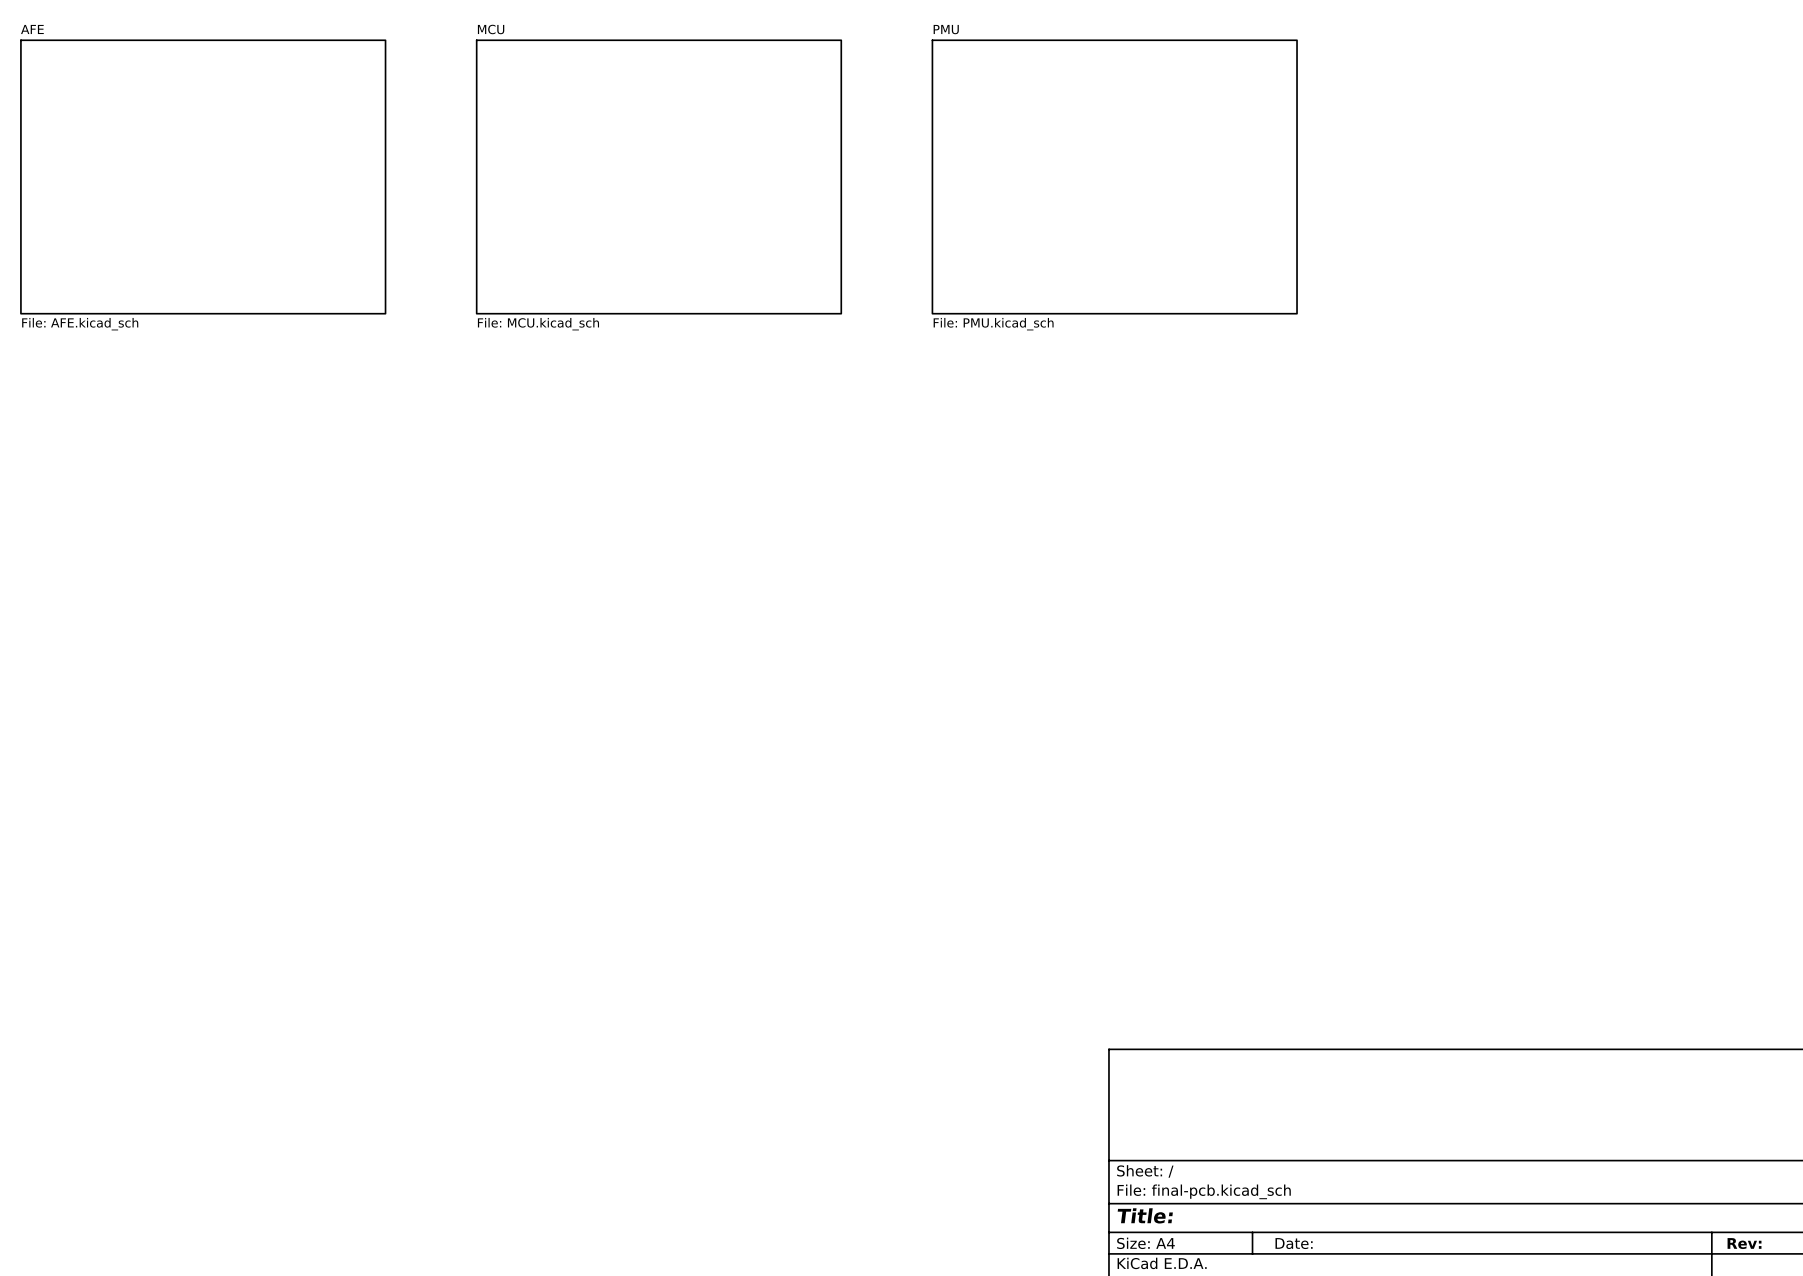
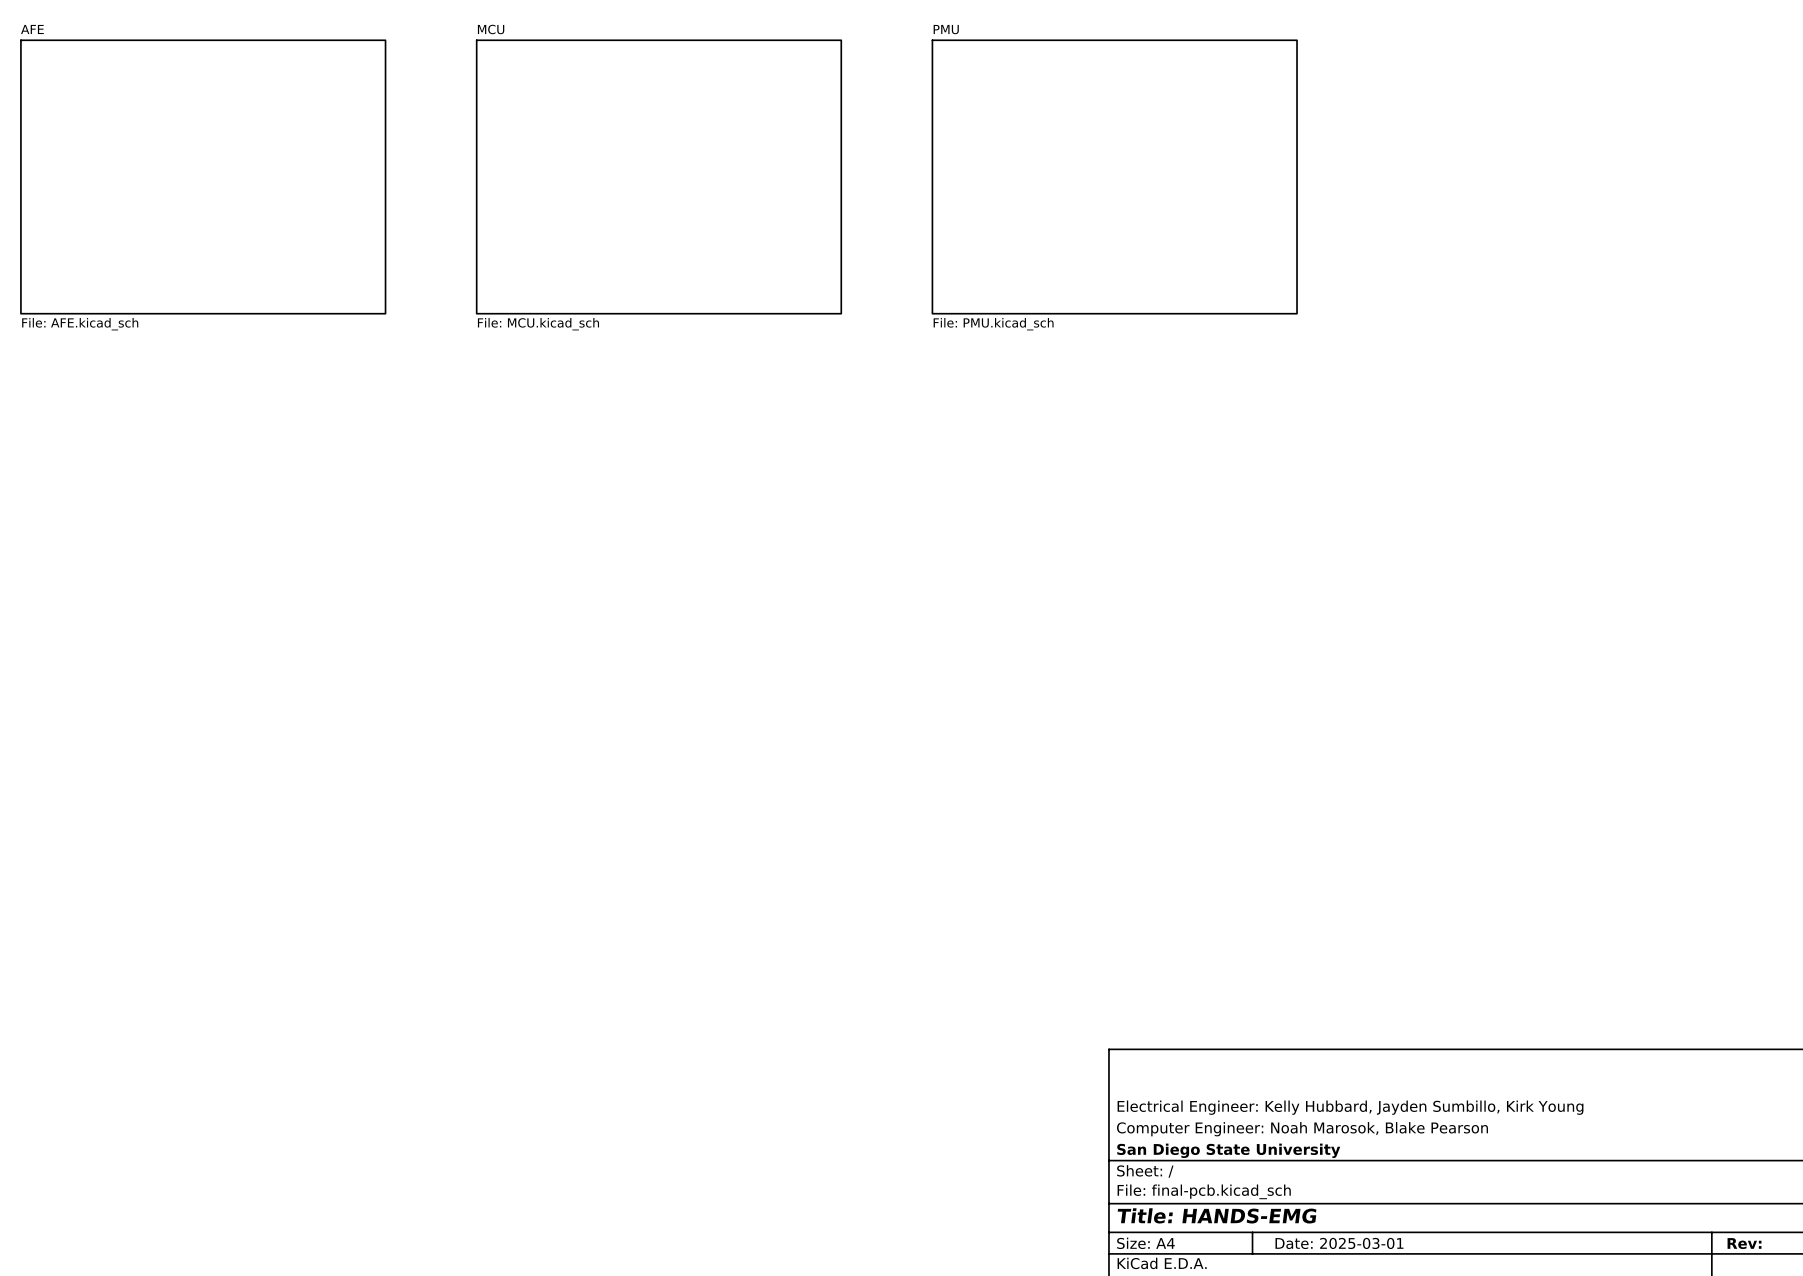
title block: none -> Electrical Engineer: Kelly Hubbard, Jayden Sumbillo, Kirk Young (1350, 1107)
title block: none -> Computer Engineer: Noah Marosok, Blake Pearson (1302, 1129)
title block: none -> San Diego State University (1228, 1150)
title block: Title: (1145, 1215) -> Title: HANDS-EMG (1217, 1215)
title block: Date: (1294, 1243) -> Date: 2025-03-01 (1339, 1243)

